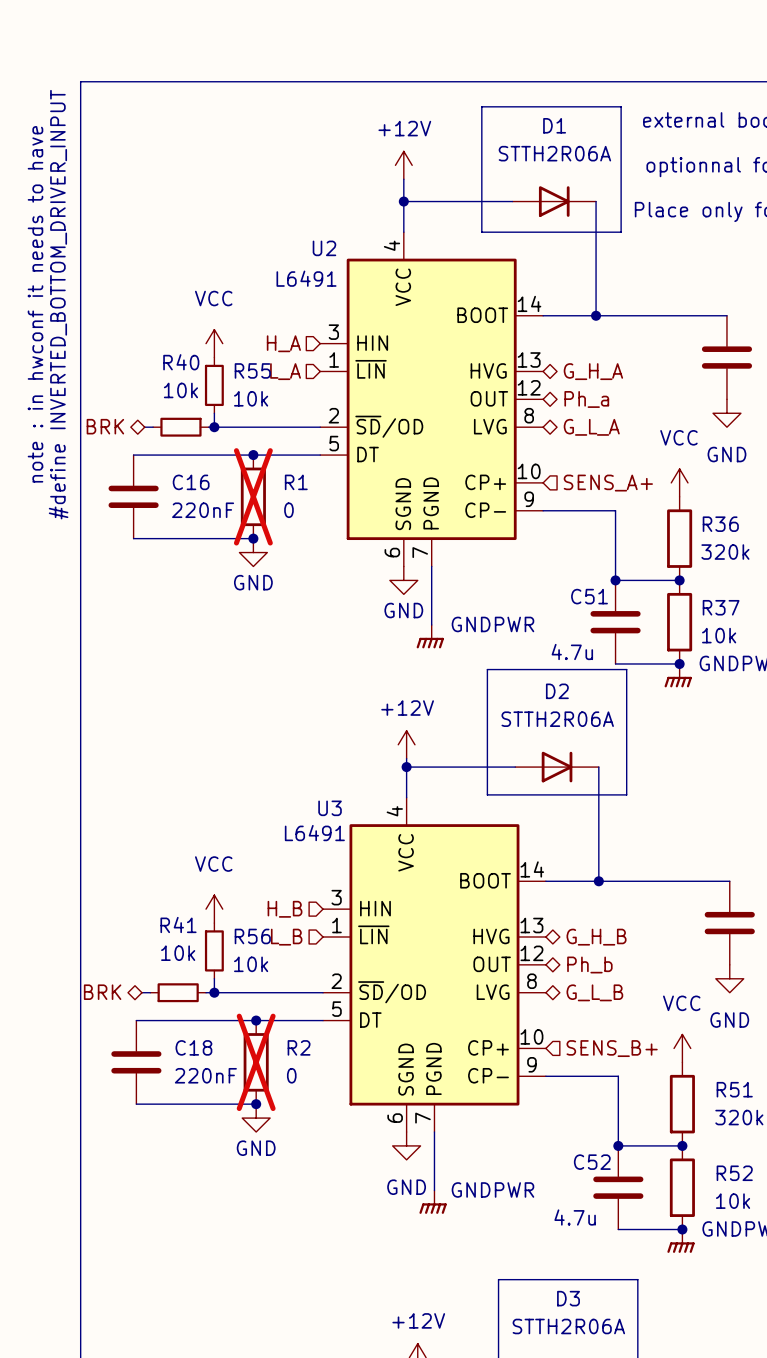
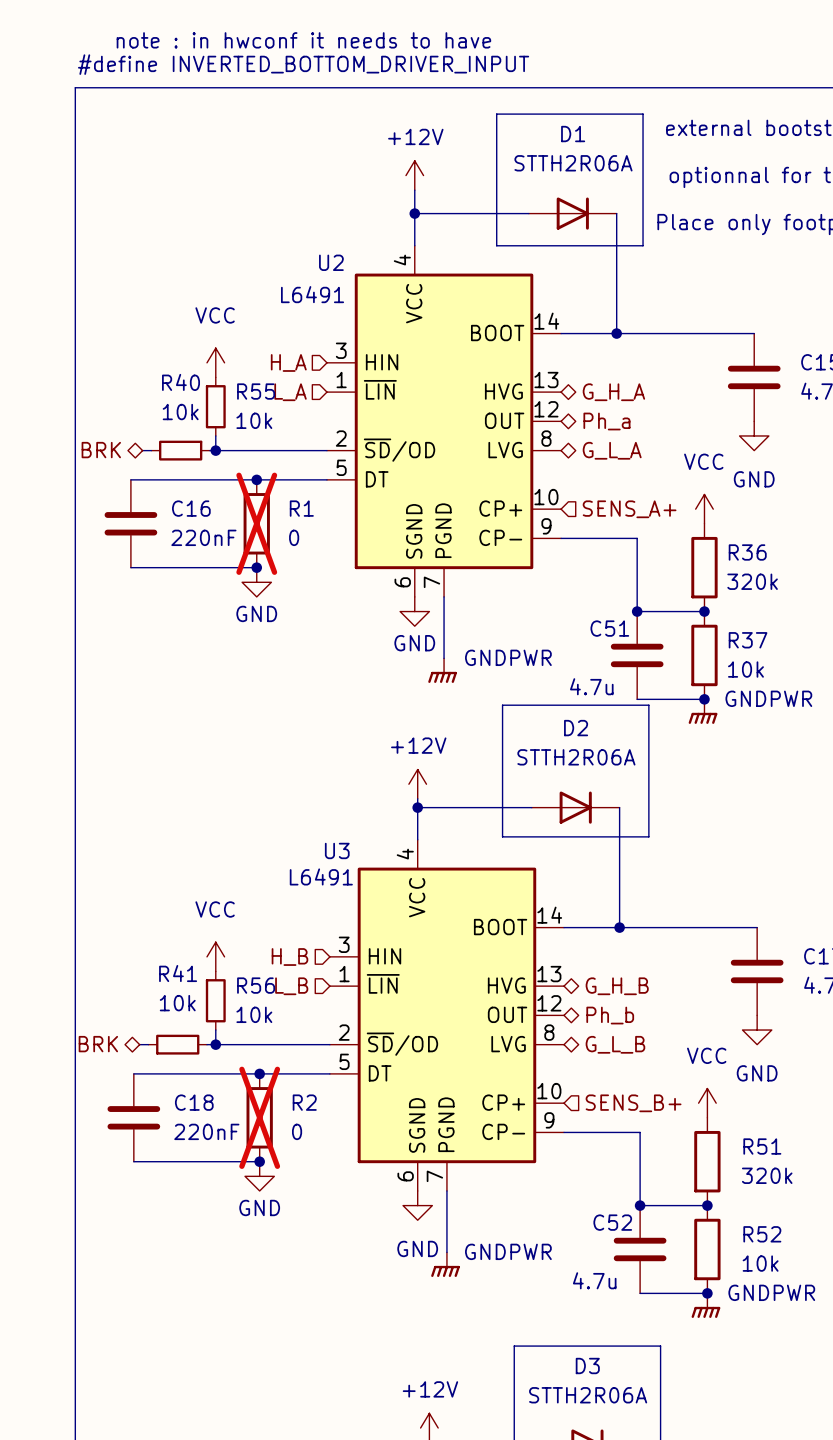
text: none -> note : in hwconf it needs to have (303, 40)
text: none -> #define INVERTED_BOTTOM_DRIVER_INPUT (303, 64)
text: note : in hwconf it needs to have (35, 304) -> none
text: #define INVERTED_BOTTOM_DRIVER_INPUT (58, 304) -> none

